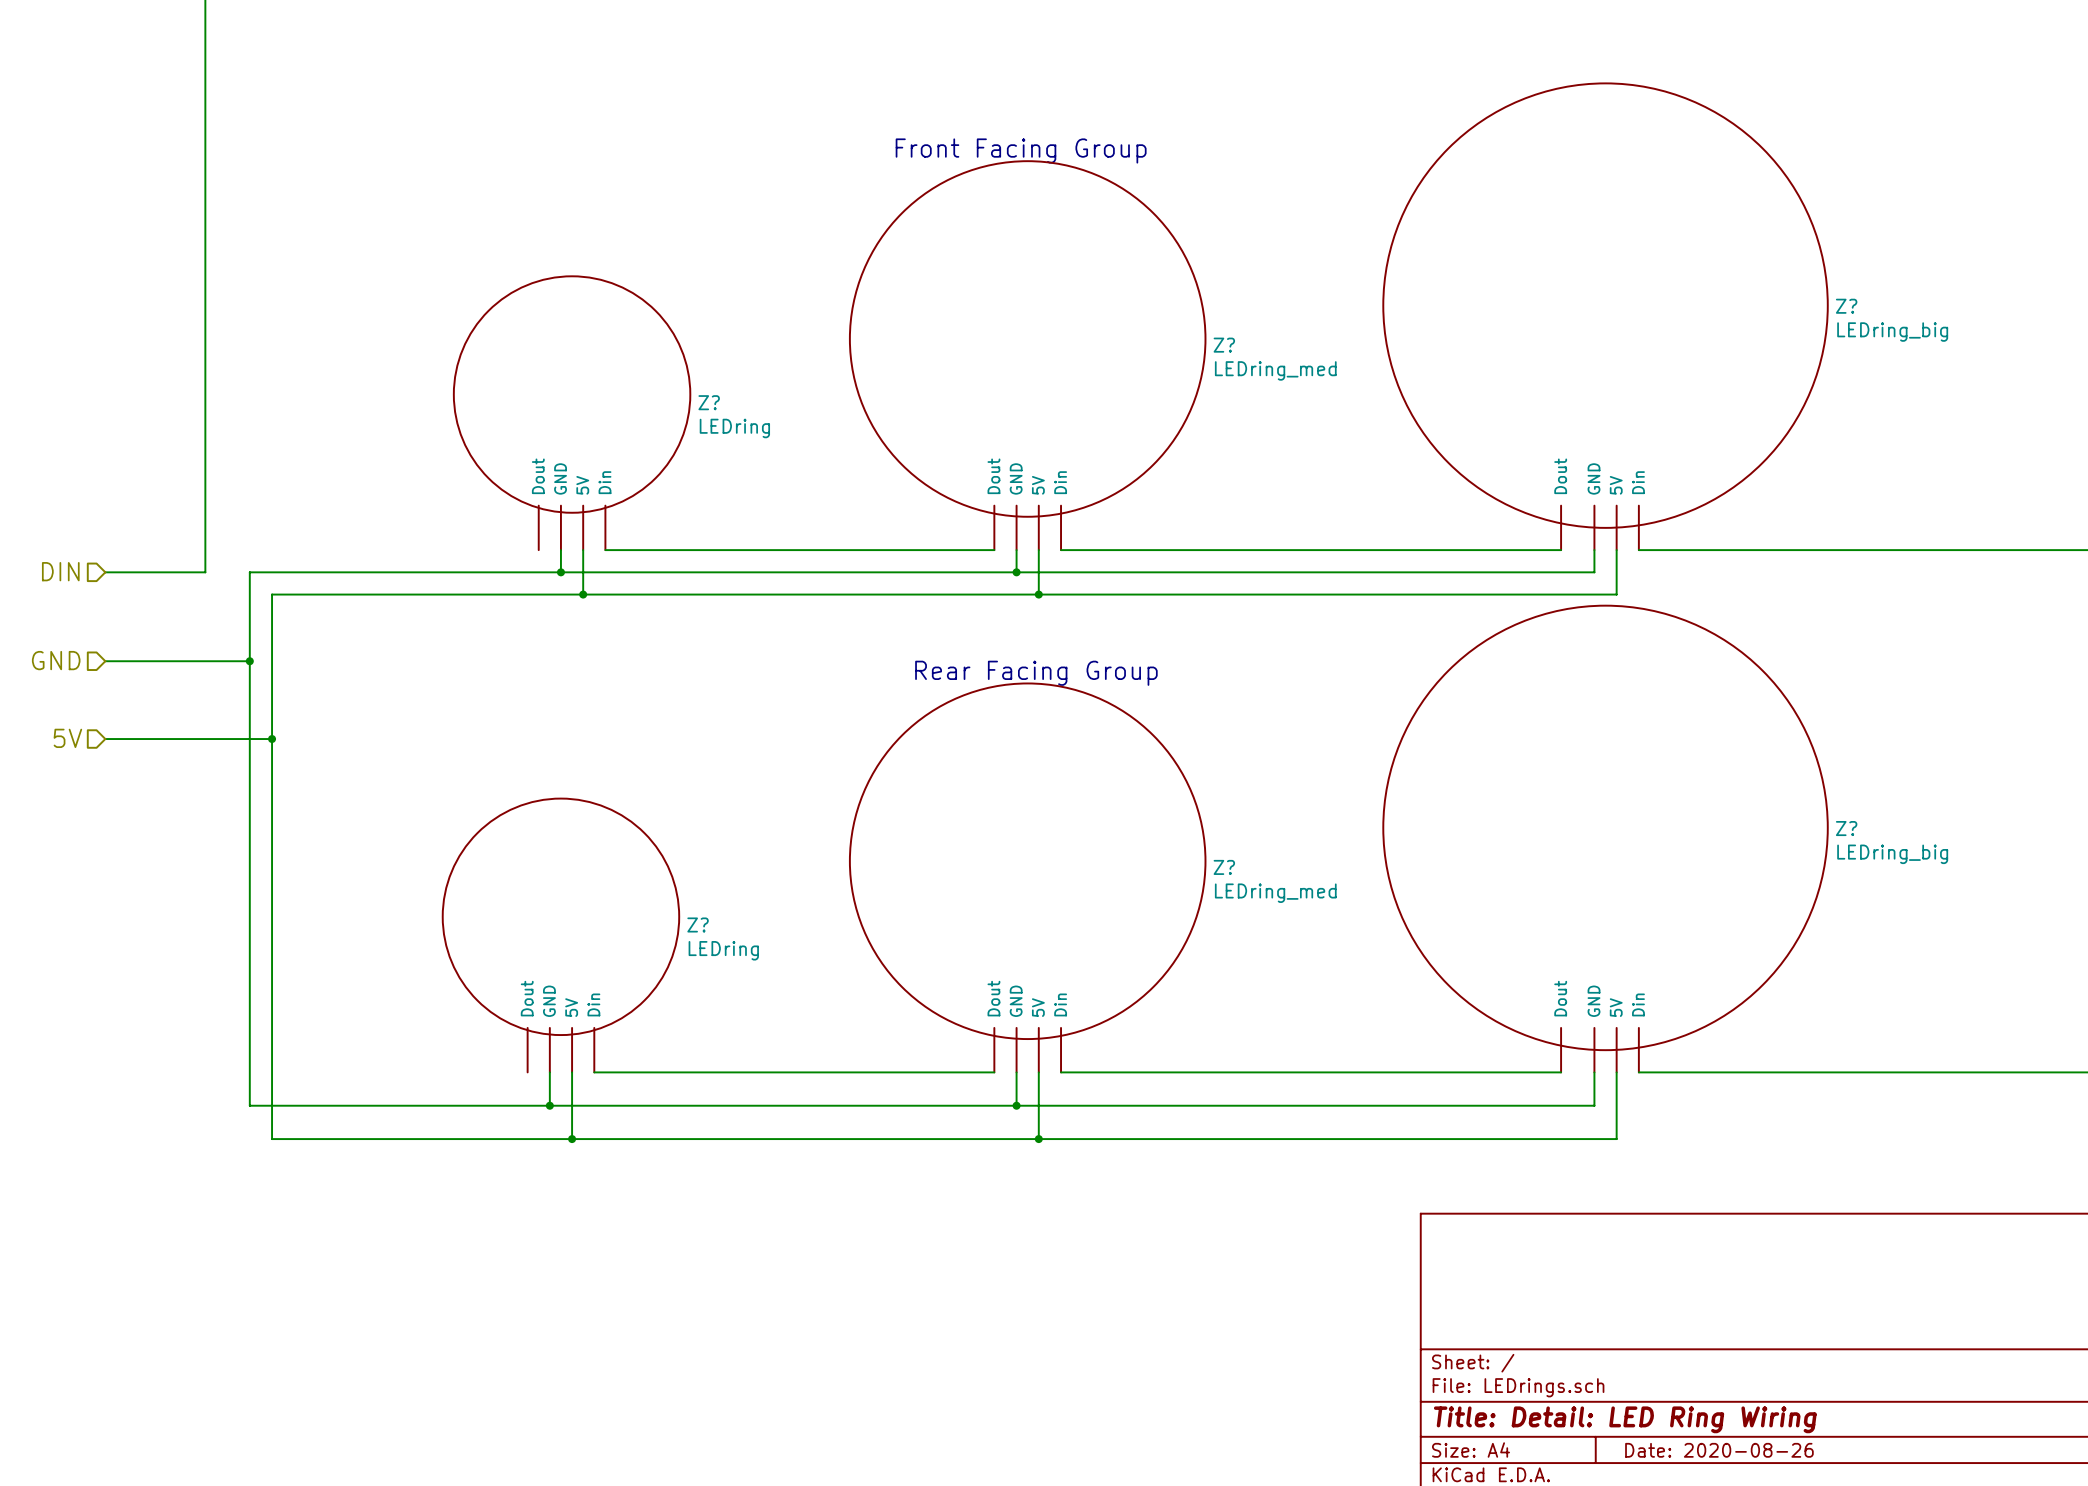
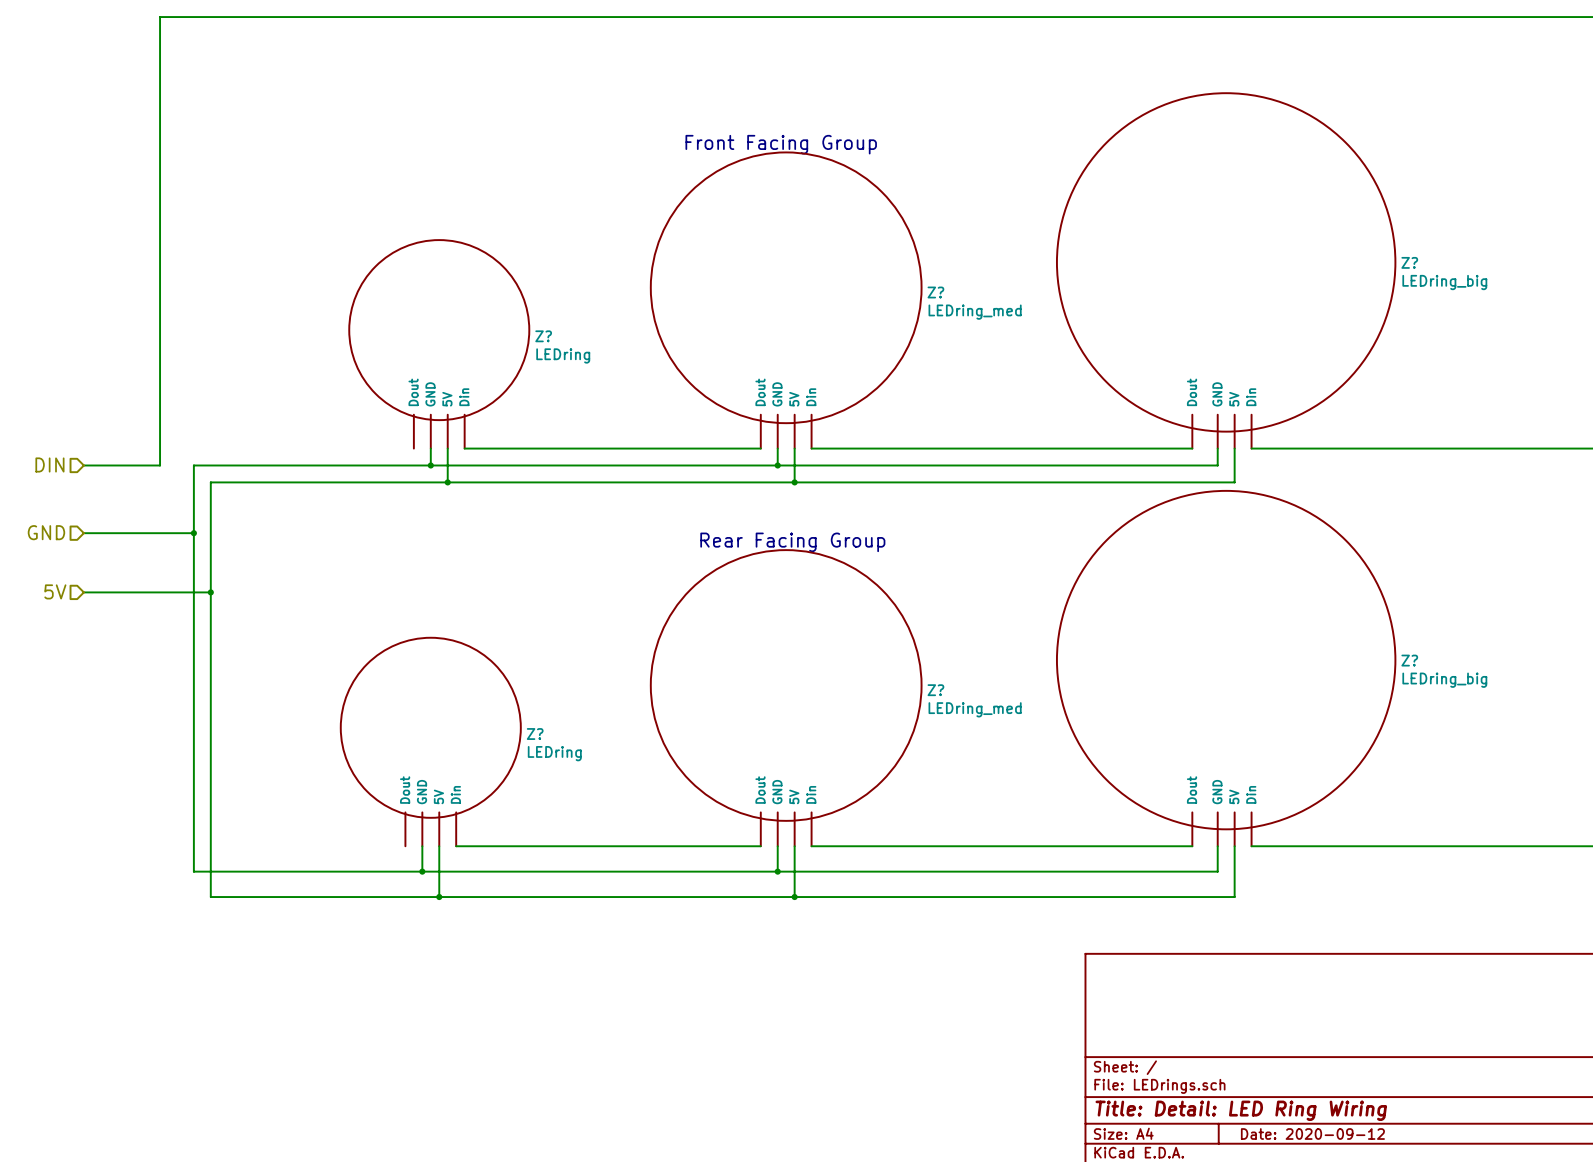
title block: Date: 2020-08-26 (1719, 1450) -> Date: 2020-09-12 (1312, 1134)

